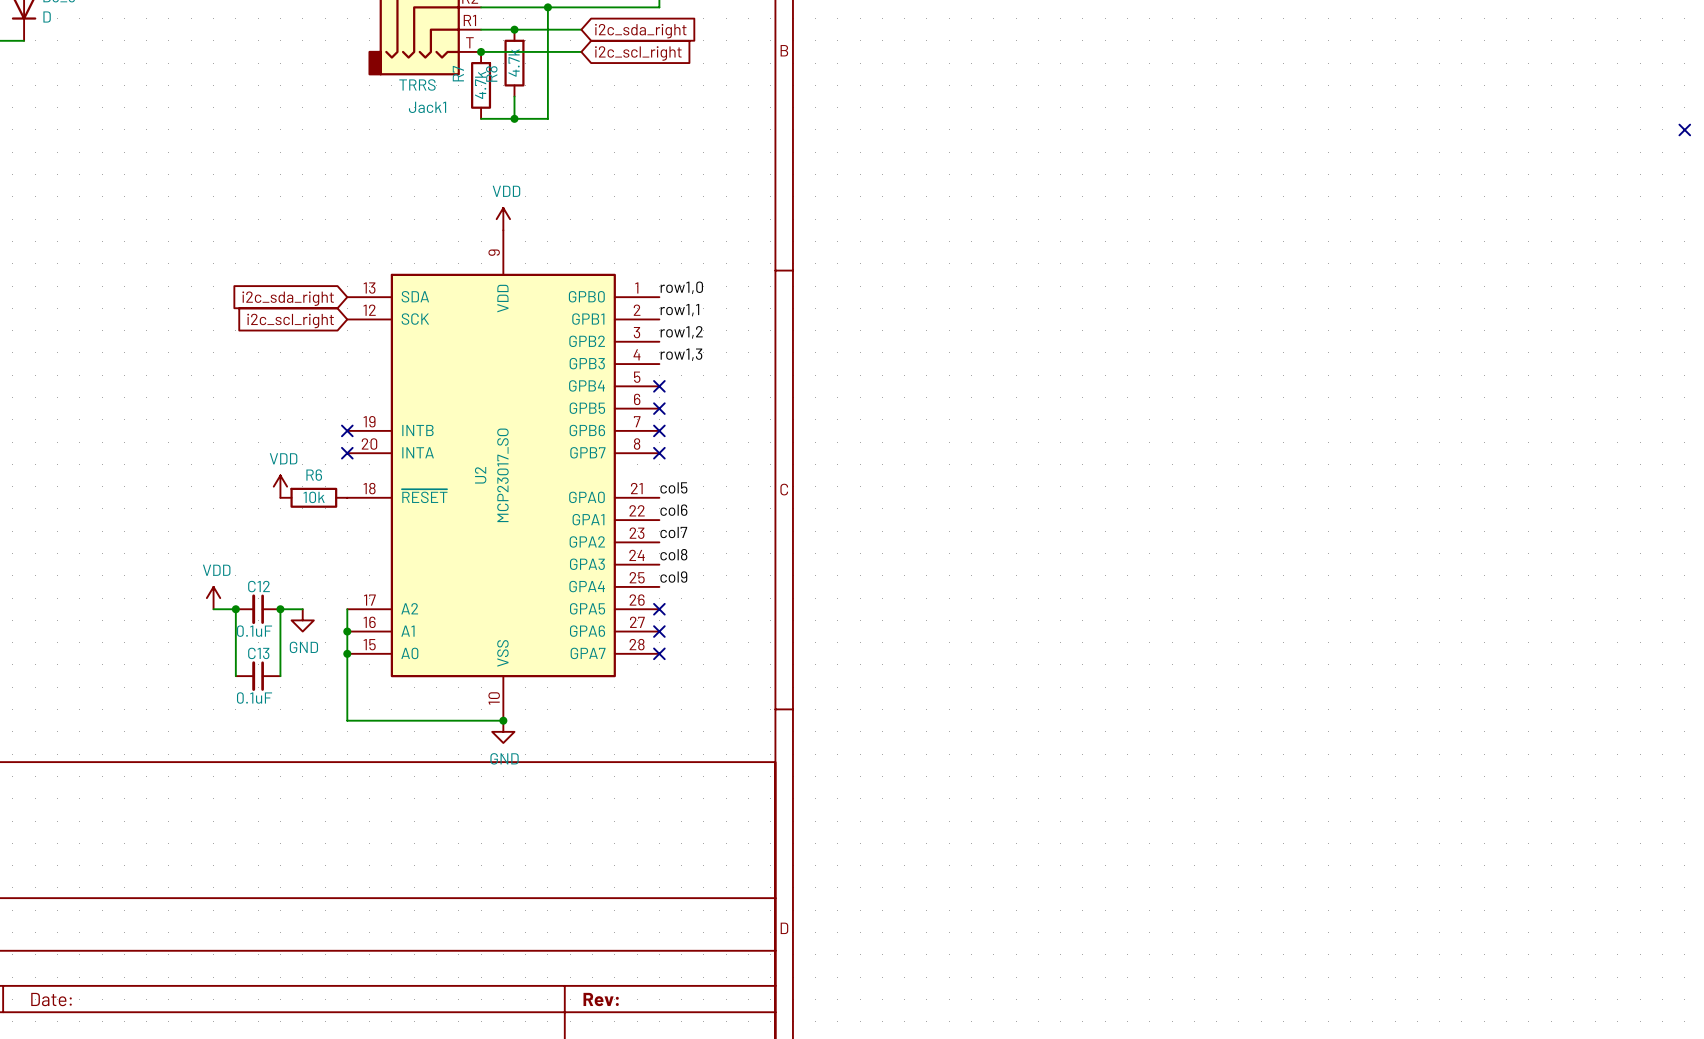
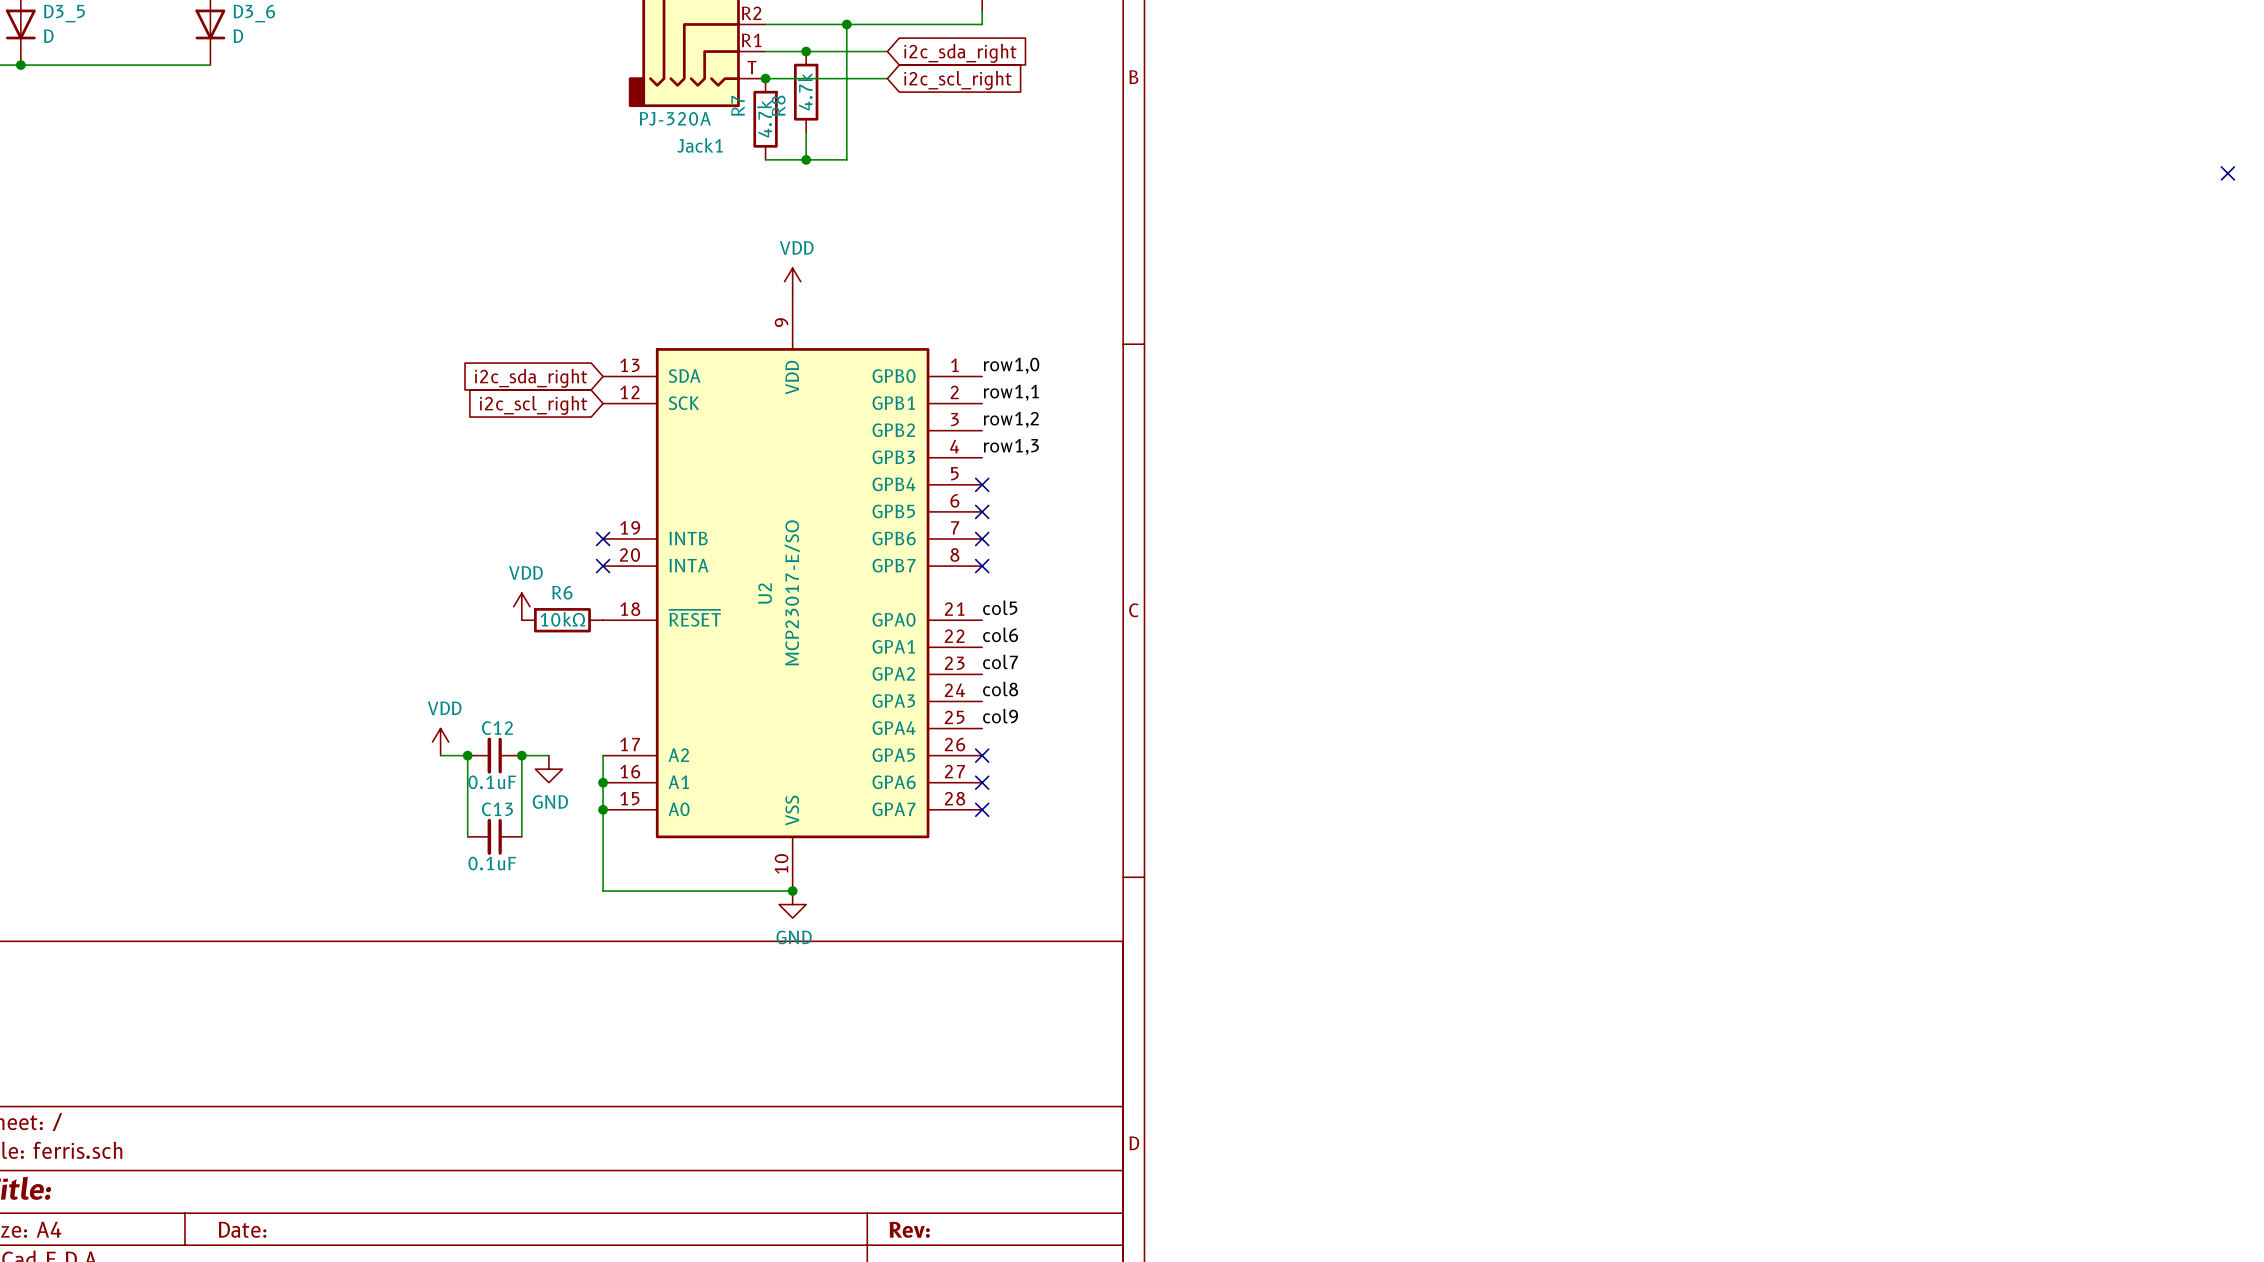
Jack1 value: TRRS (417, 84) -> PJ-320A (675, 118)
U2 value: MCP23017_SO (502, 475) -> MCP23017-E/SO (792, 592)
R6 value: 10k (314, 497) -> 10kΩ (562, 619)

